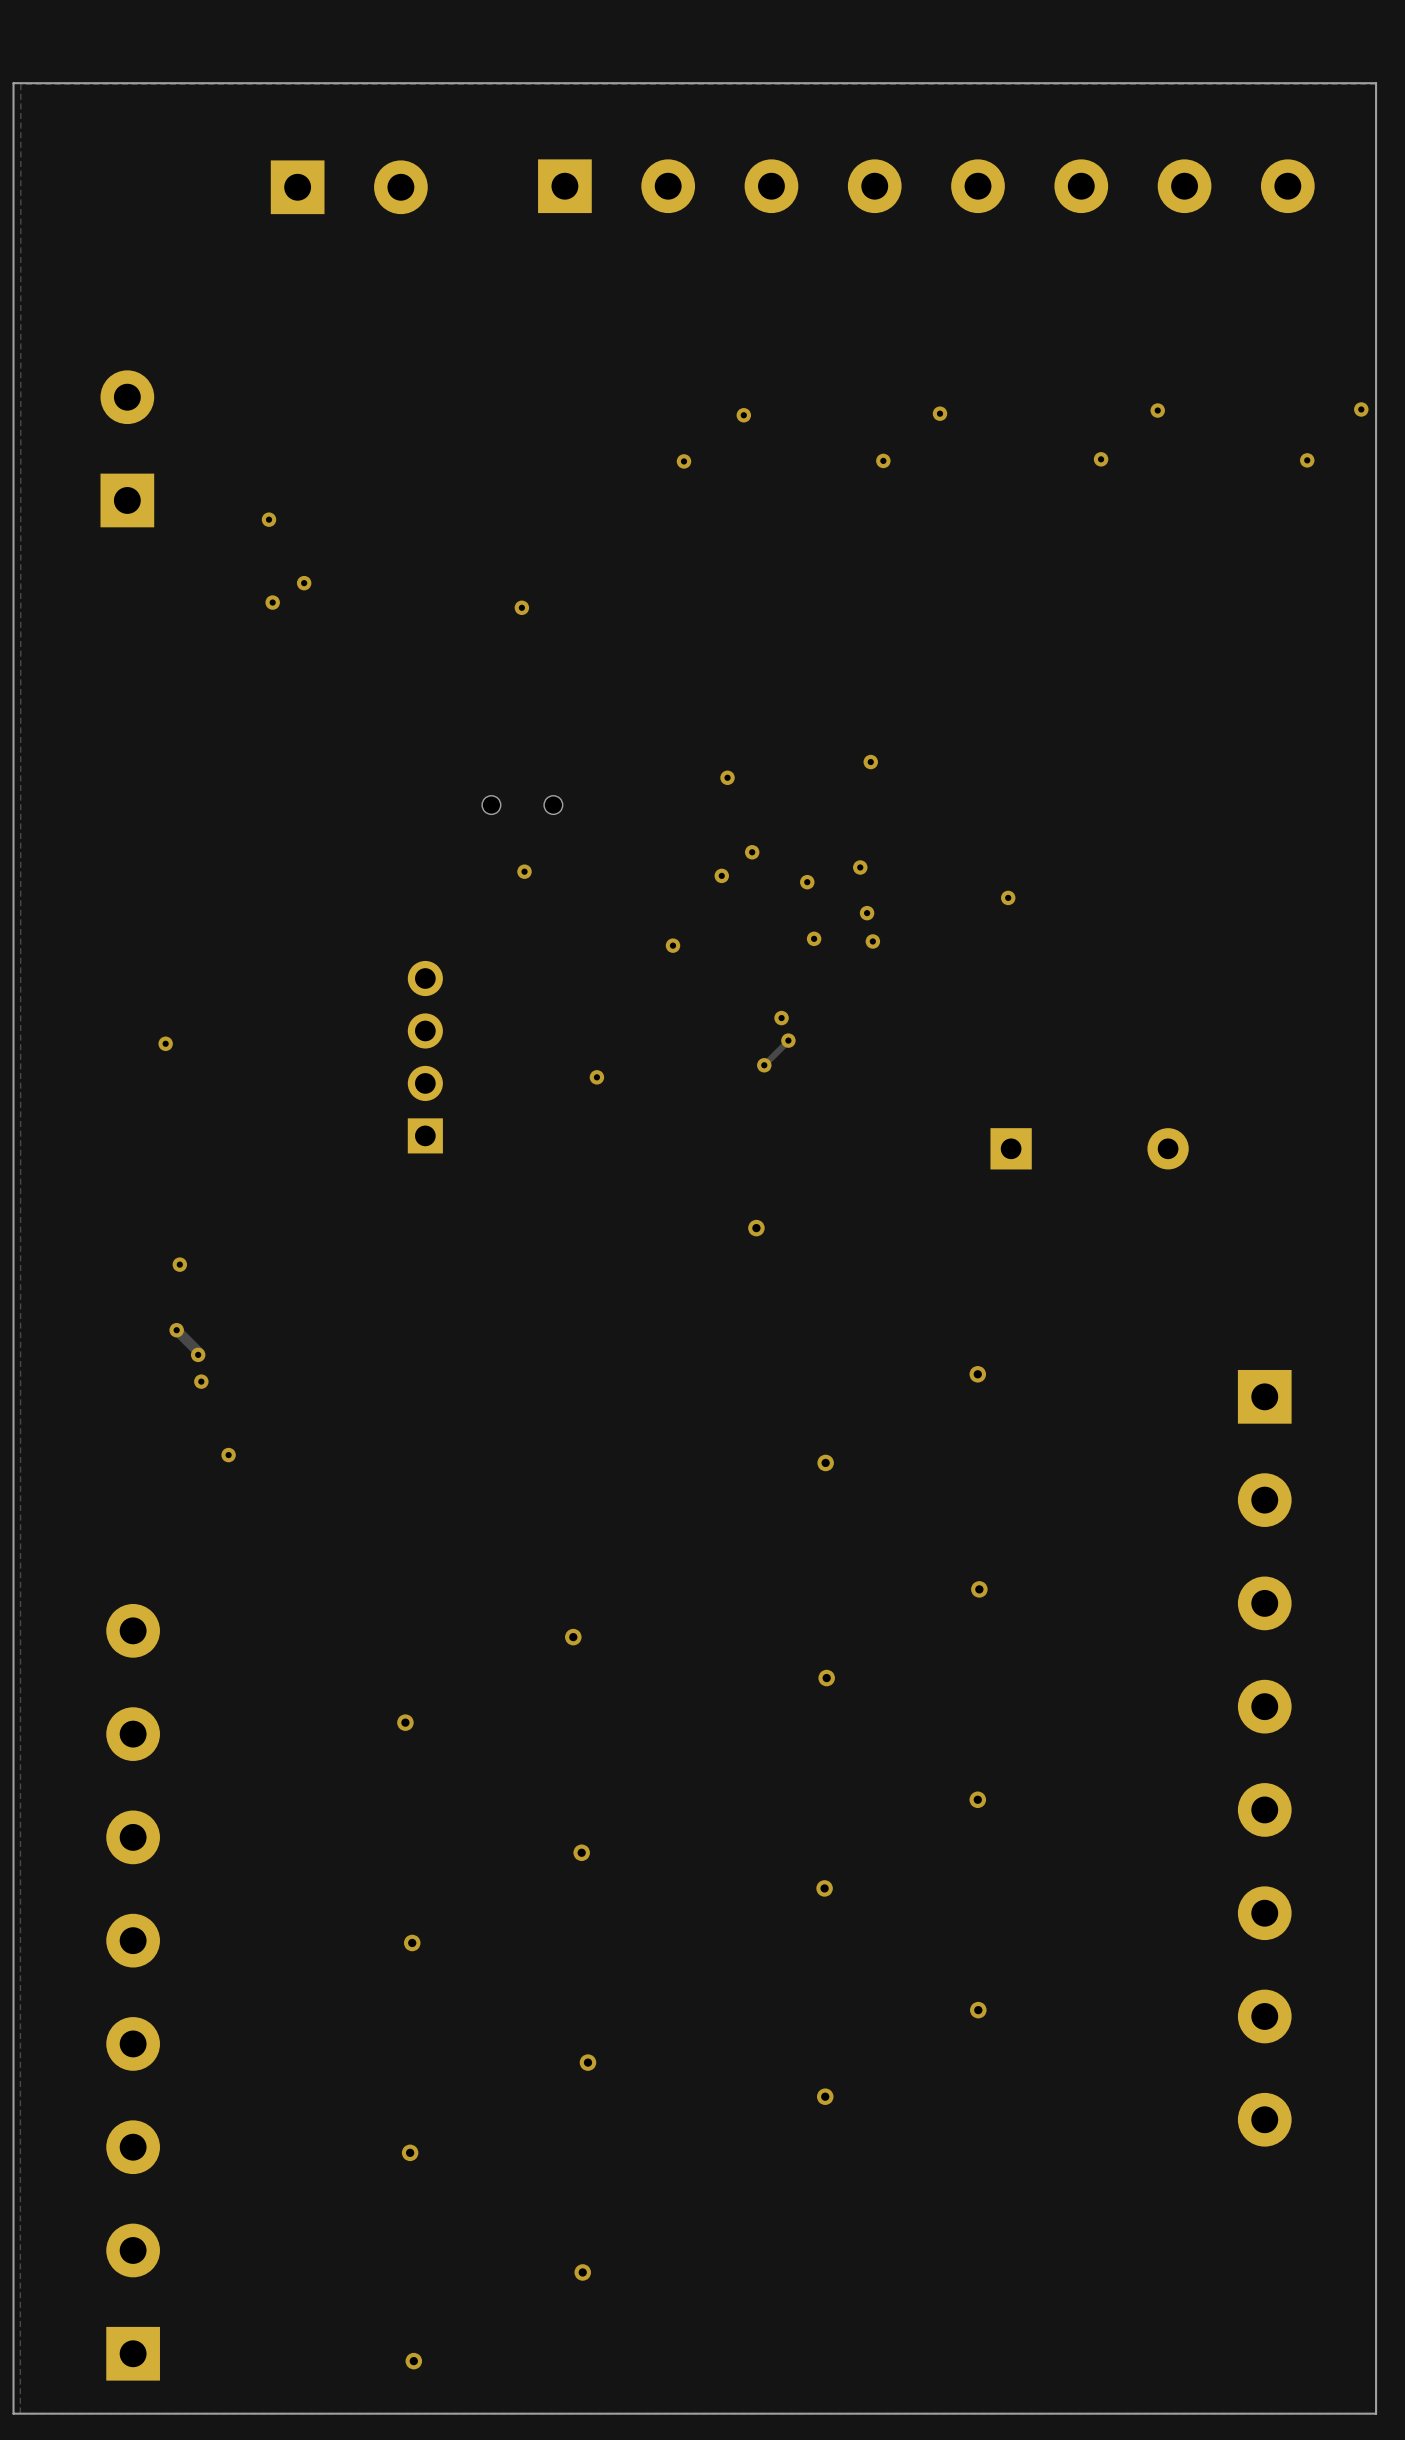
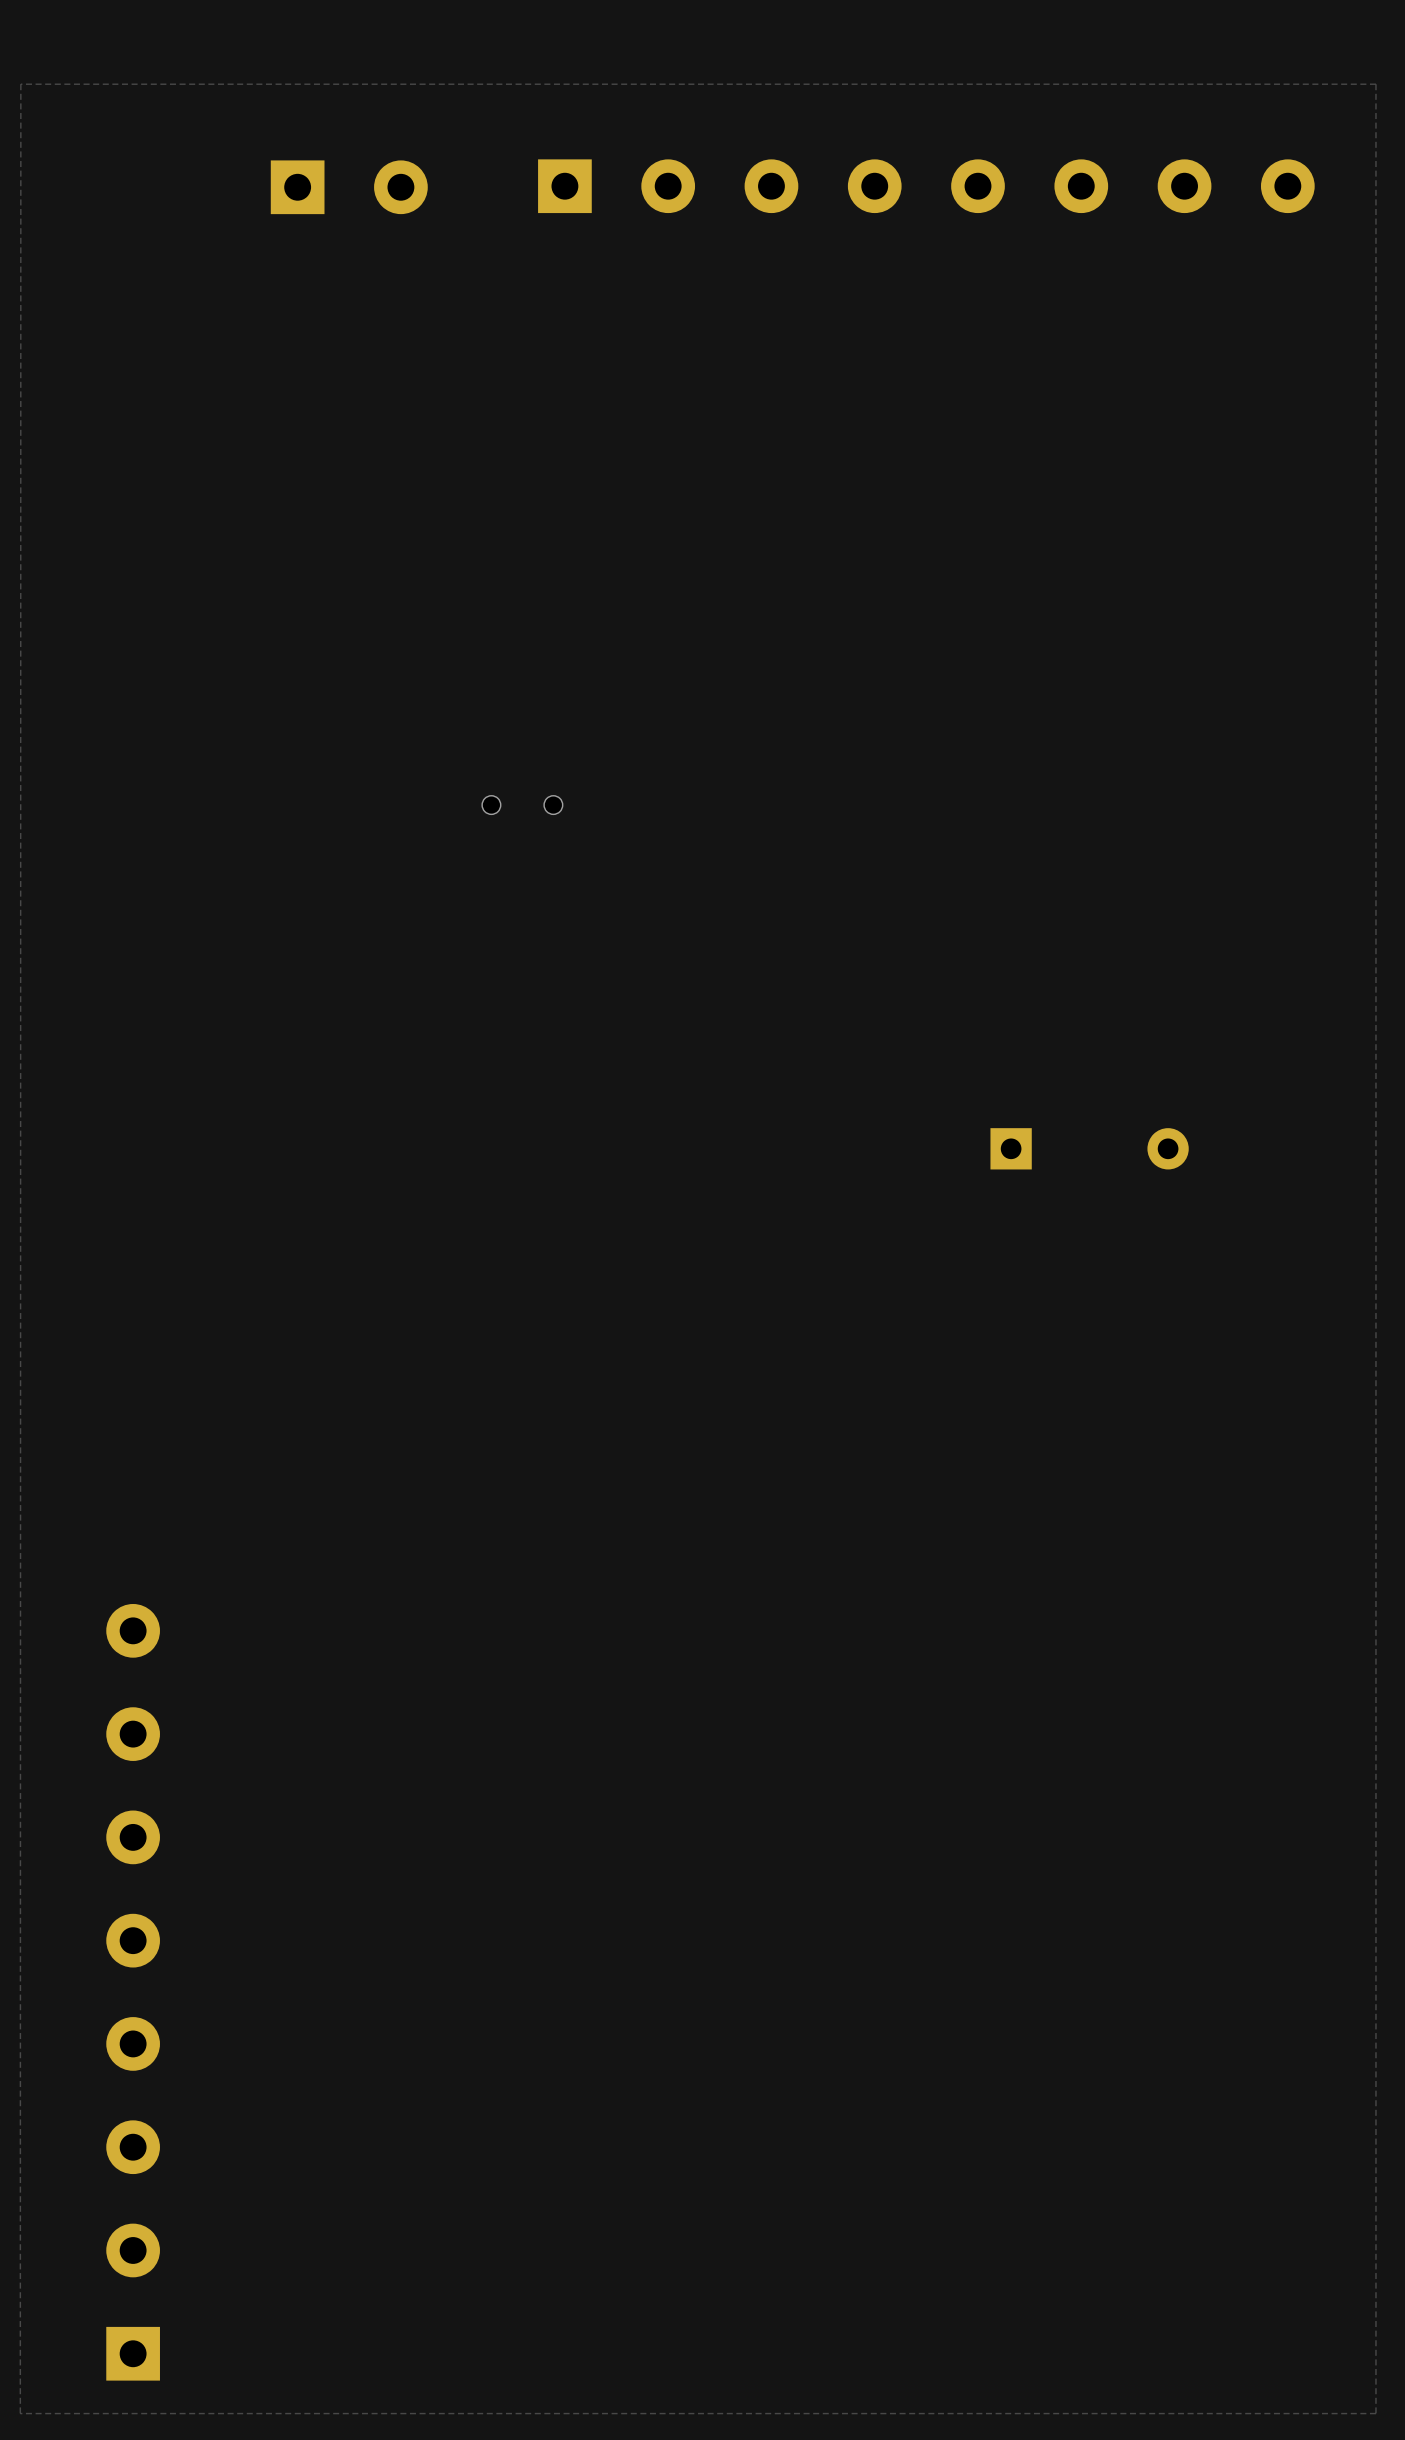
board edge: (1376, 83) (13, 83) (13, 2413) (1376, 2413) (1376, 83) -> none
via: (1361, 409) -> none
via: (1157, 410) -> none
via: (940, 413) -> none
via: (743, 415) -> none
part: (127, 448) -> none
via: (1101, 459) -> none
via: (883, 460) -> none
via: (1307, 460) -> none
via: (683, 461) -> none
via: (269, 519) -> none
via: (304, 583) -> none
via: (272, 602) -> none
via: (521, 607) -> none
via: (870, 762) -> none
via: (727, 777) -> none
via: (752, 852) -> none
via: (860, 867) -> none
via: (524, 871) -> none
via: (721, 875) -> none
via: (807, 882) -> none
via: (1008, 897) -> none
via: (867, 913) -> none
via: (814, 938) -> none
via: (872, 941) -> none
via: (672, 945) -> none
via: (781, 1018) -> none
track: (788, 1040) (764, 1065) -> none
via: (788, 1040) -> none
via: (165, 1043) -> none
part: (425, 1057) -> none
via: (764, 1065) -> none
via: (596, 1077) -> none
via: (756, 1228) -> none
via: (179, 1264) -> none
track: (176, 1330) (198, 1351) (198, 1354) -> none
via: (176, 1330) -> none
via: (198, 1354) -> none
via: (977, 1374) -> none
via: (201, 1381) -> none
via: (228, 1455) -> none
via: (825, 1462) -> none
via: (979, 1589) -> none
via: (573, 1637) -> none
via: (826, 1678) -> none
via: (405, 1722) -> none
part: (1264, 1758) -> none
via: (977, 1799) -> none
via: (581, 1852) -> none
via: (824, 1888) -> none
via: (412, 1942) -> none
via: (978, 2010) -> none
via: (587, 2062) -> none
via: (825, 2096) -> none
via: (410, 2152) -> none
via: (582, 2272) -> none
via: (413, 2361) -> none

